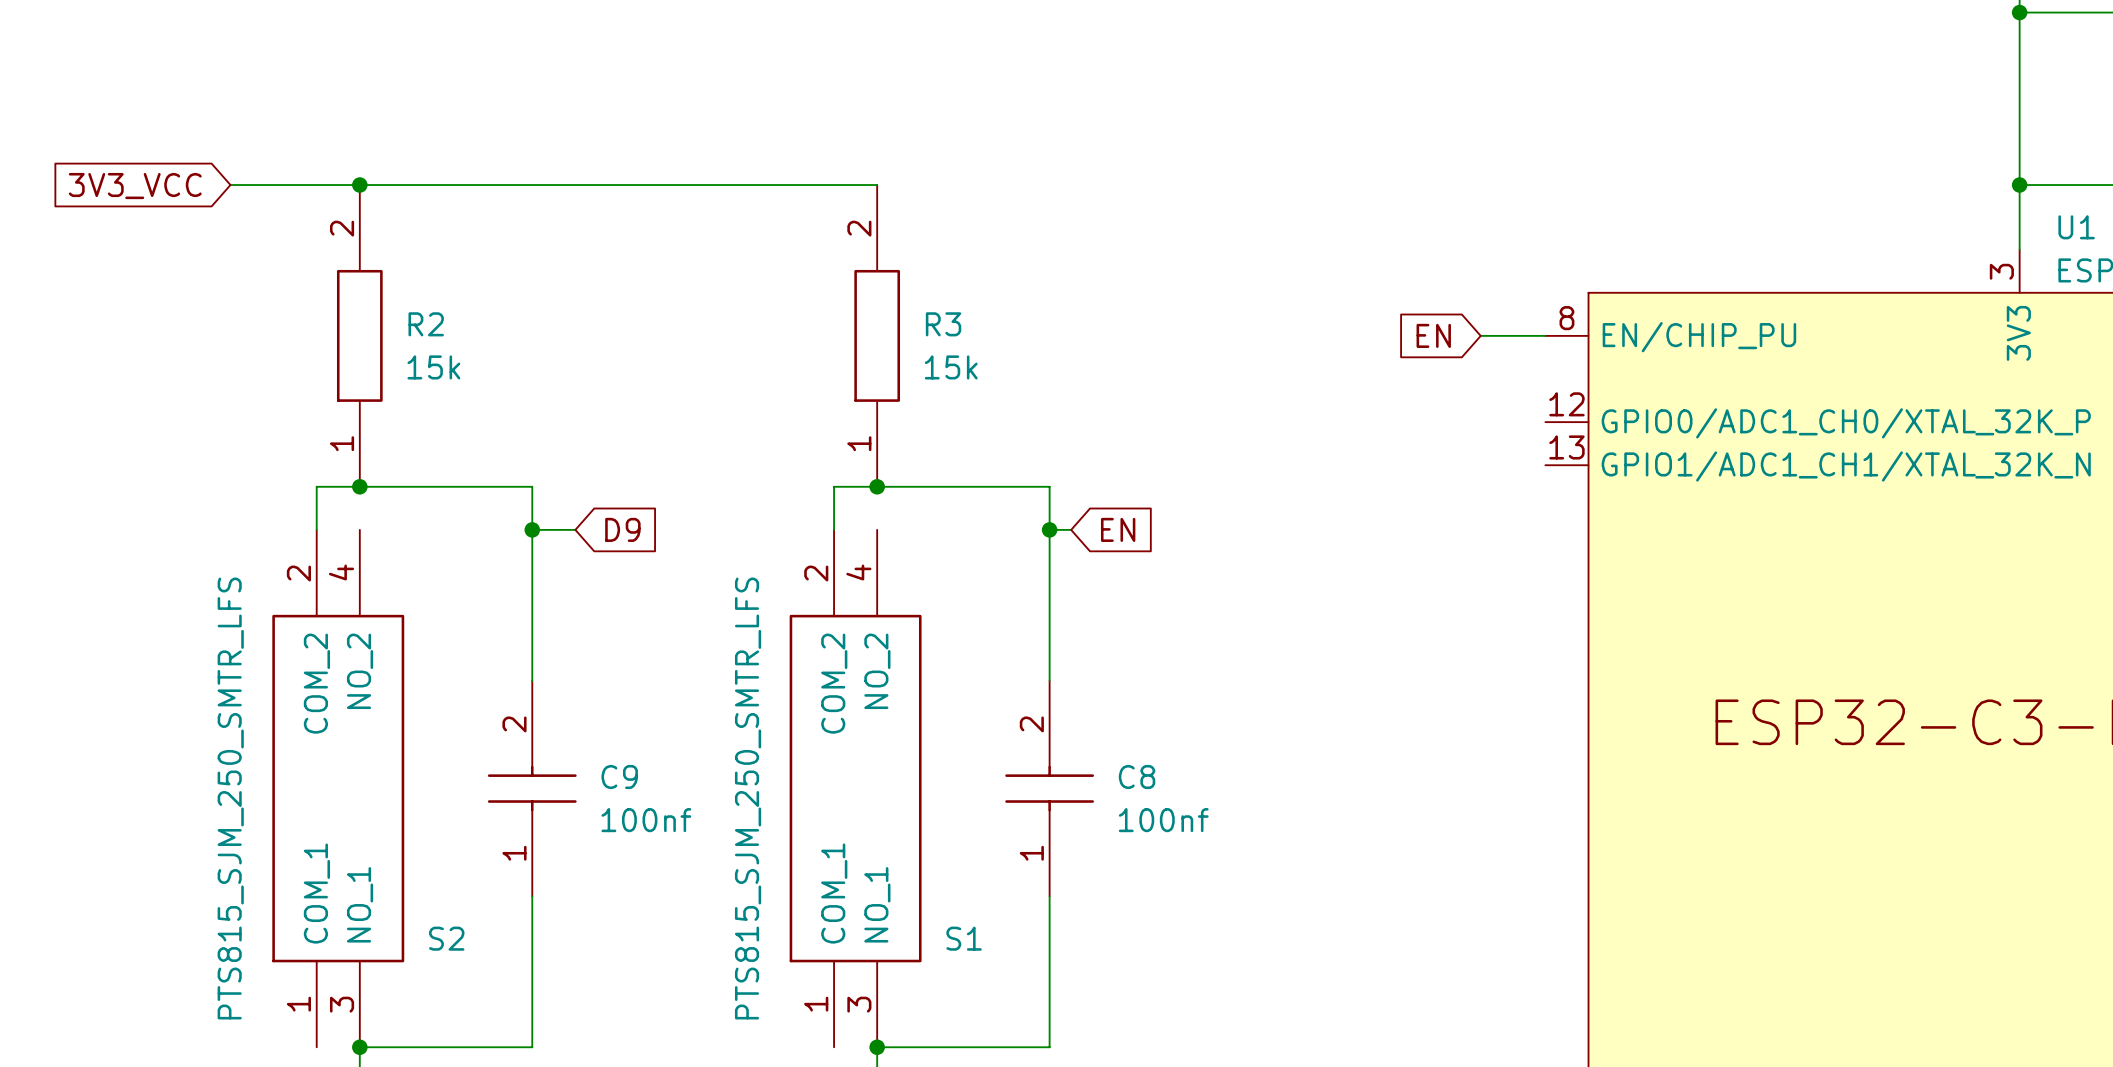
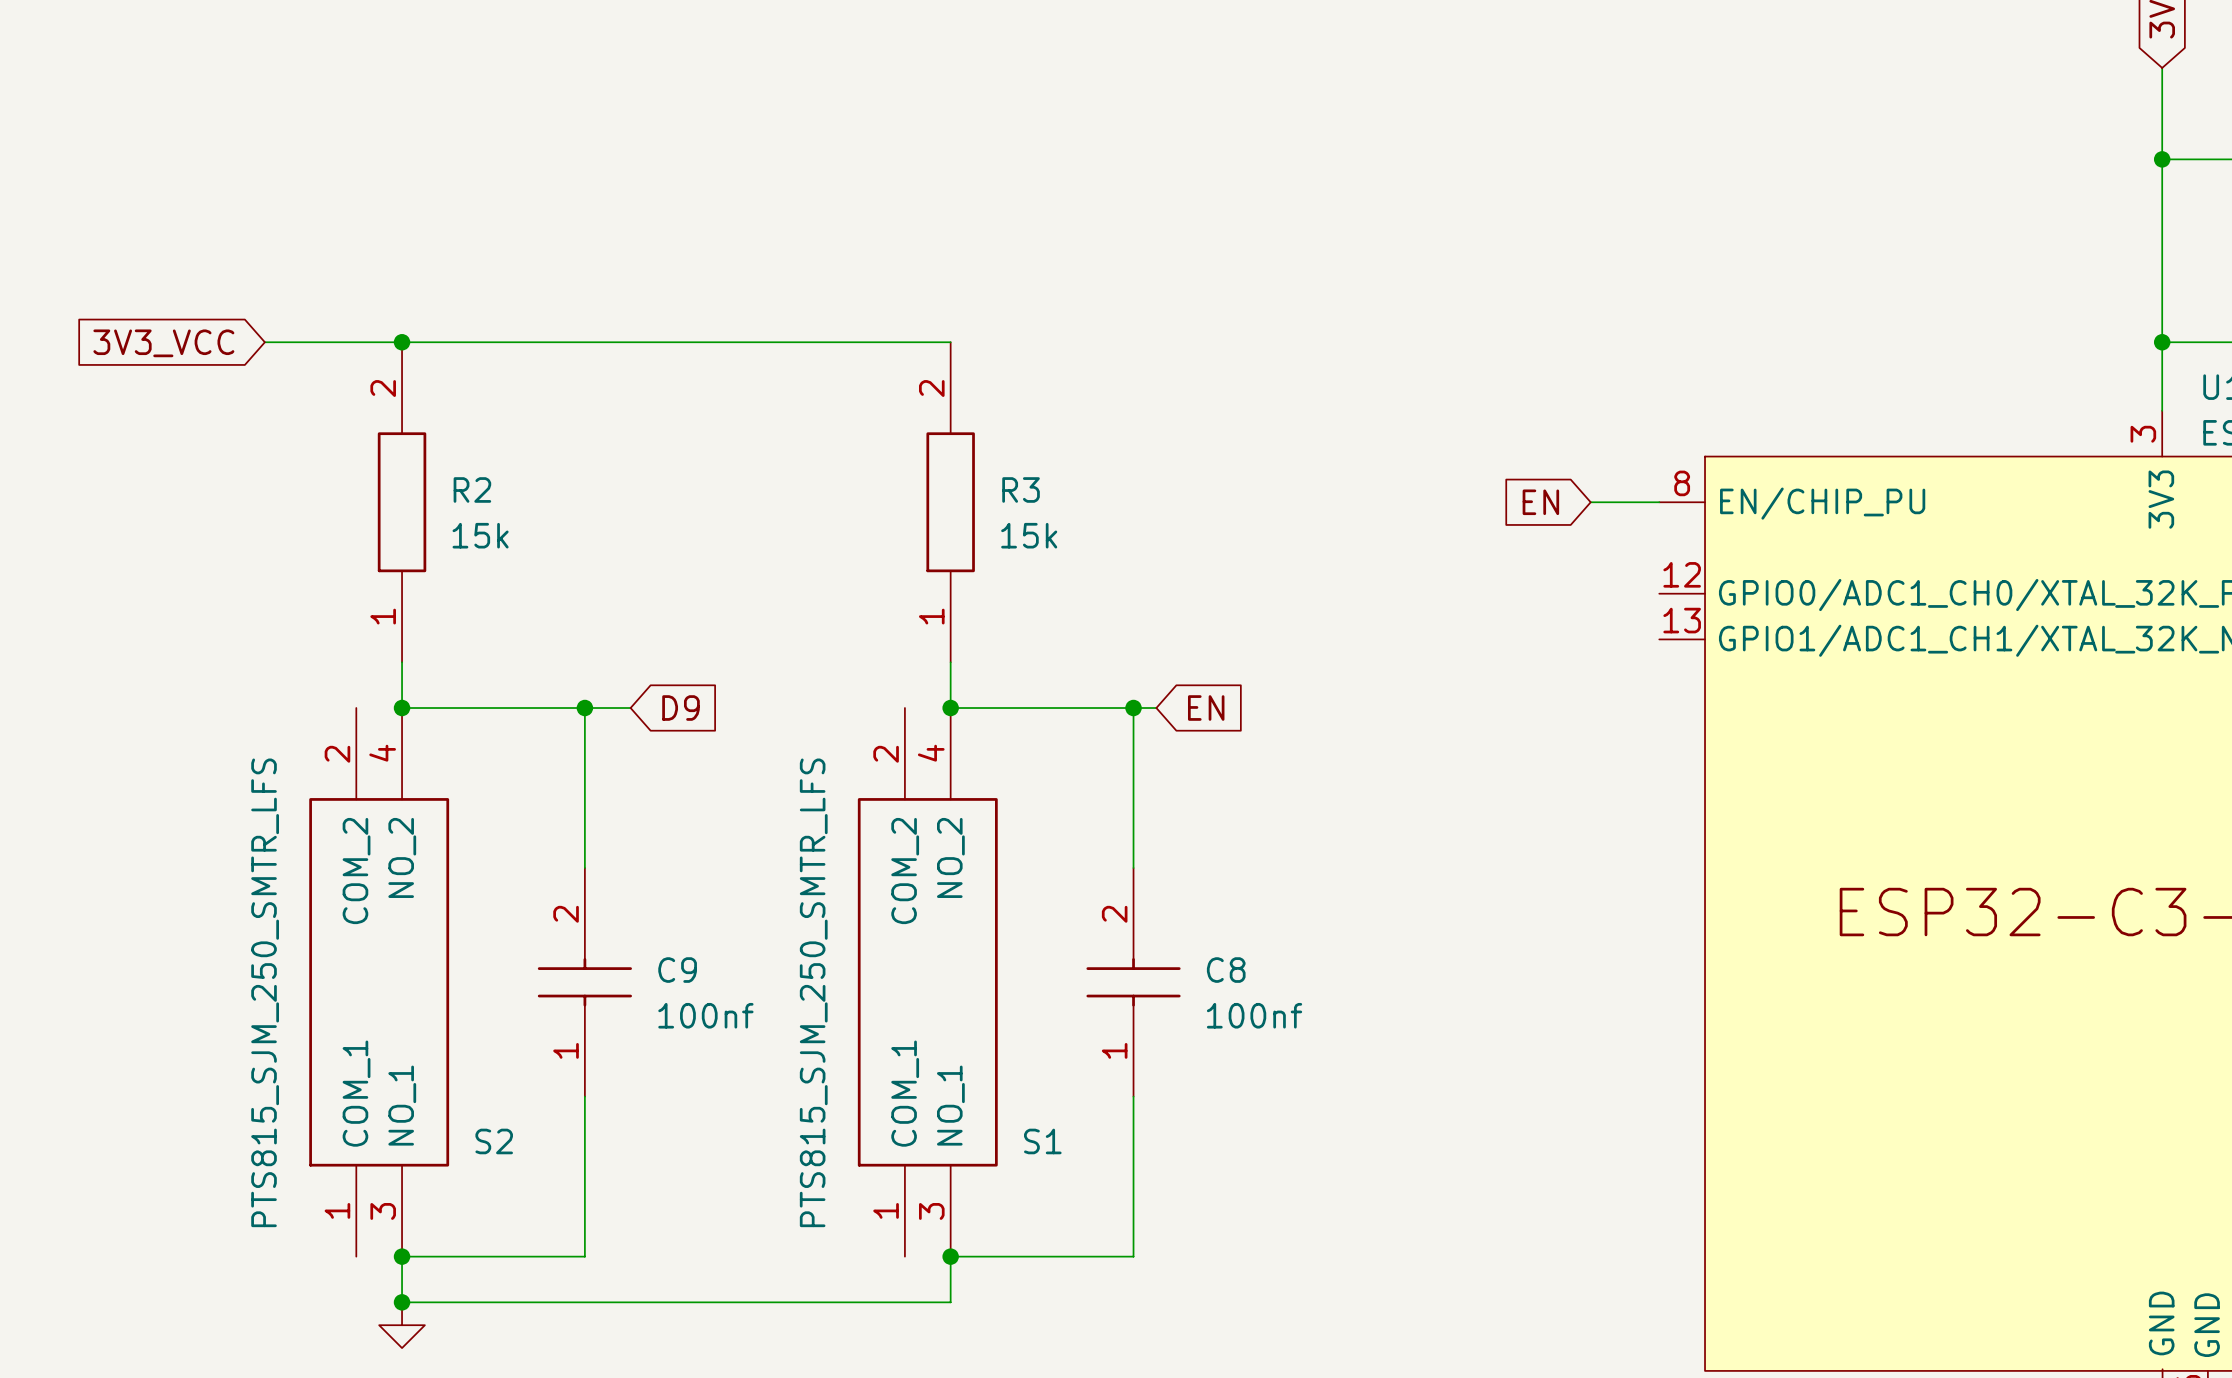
junction position: (359, 486) -> (402, 708)
junction position: (877, 486) -> (950, 708)
wire: (316, 529) (316, 486) (532, 486) (532, 529) -> (402, 662) (402, 708) (584, 708)
wire: (834, 529) (834, 486) (1049, 486) (1049, 529) -> (950, 662) (950, 708) (1133, 708)

